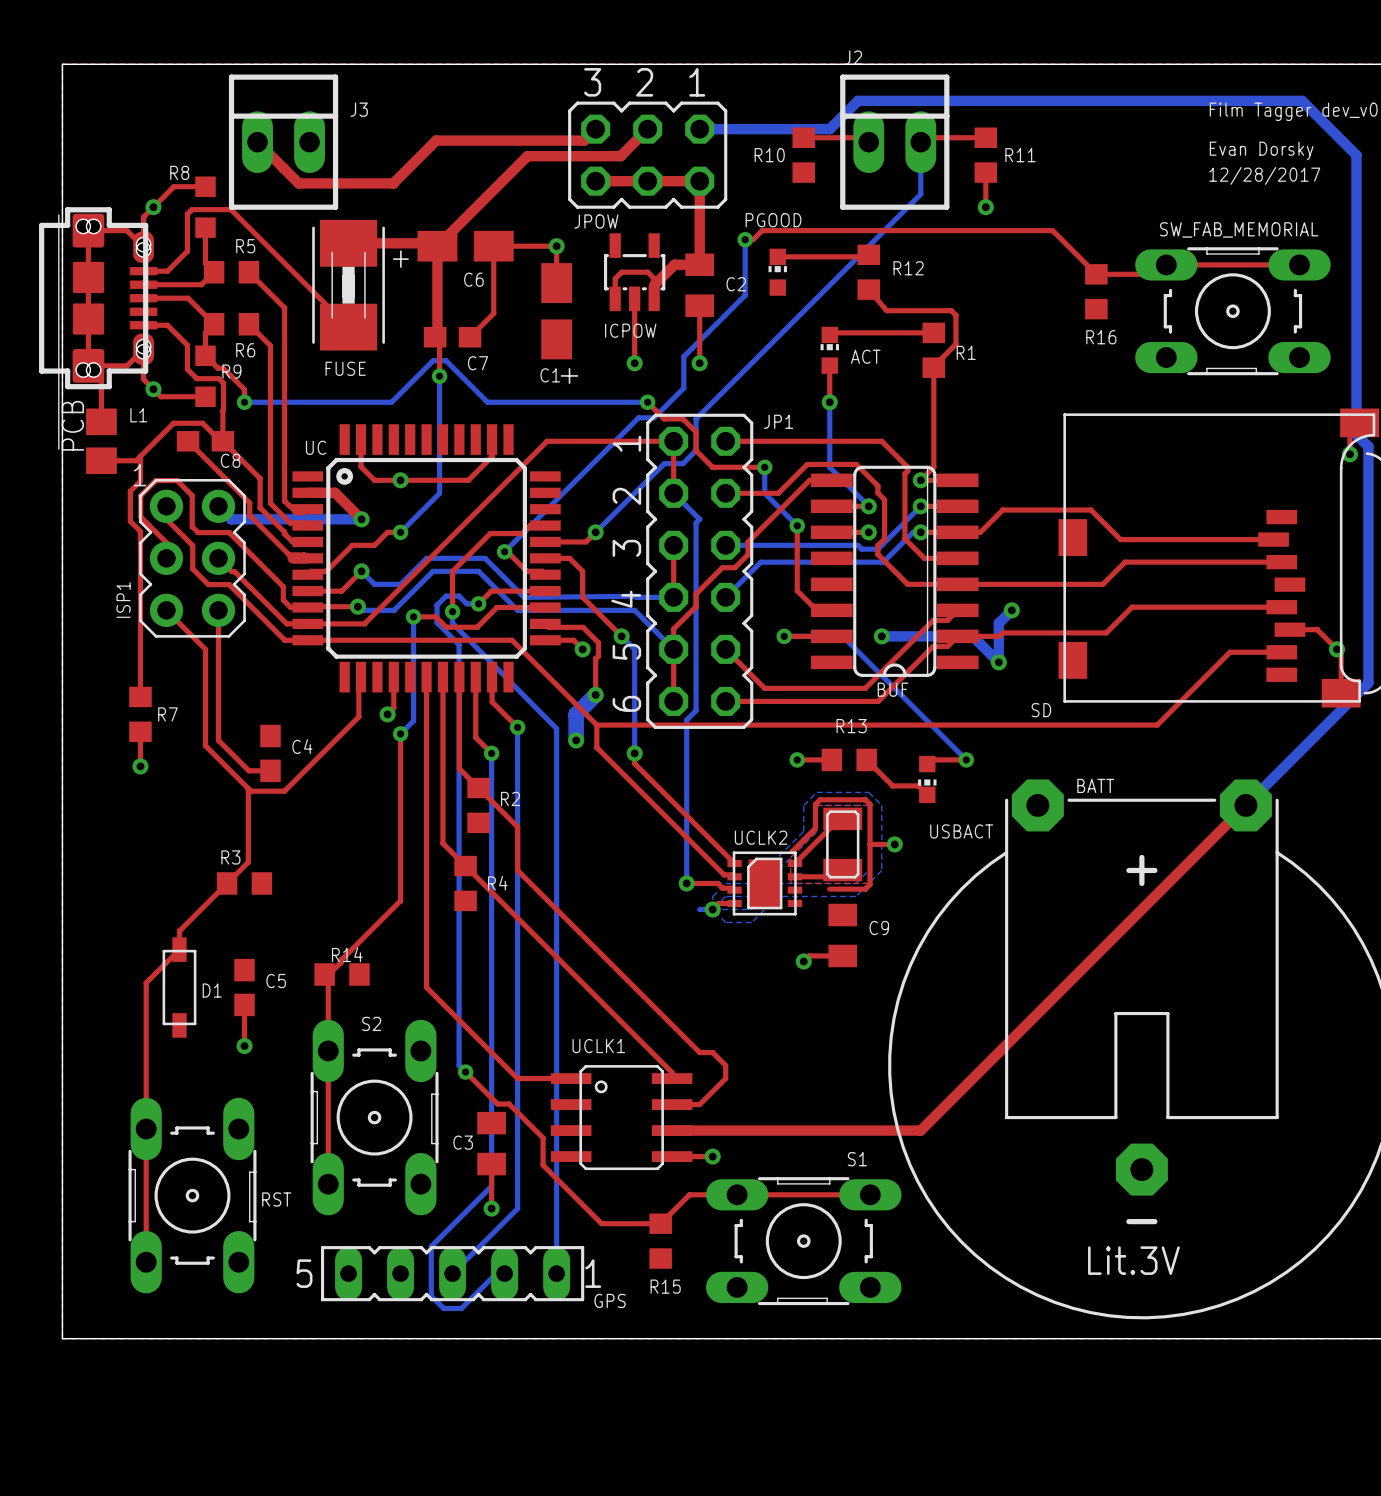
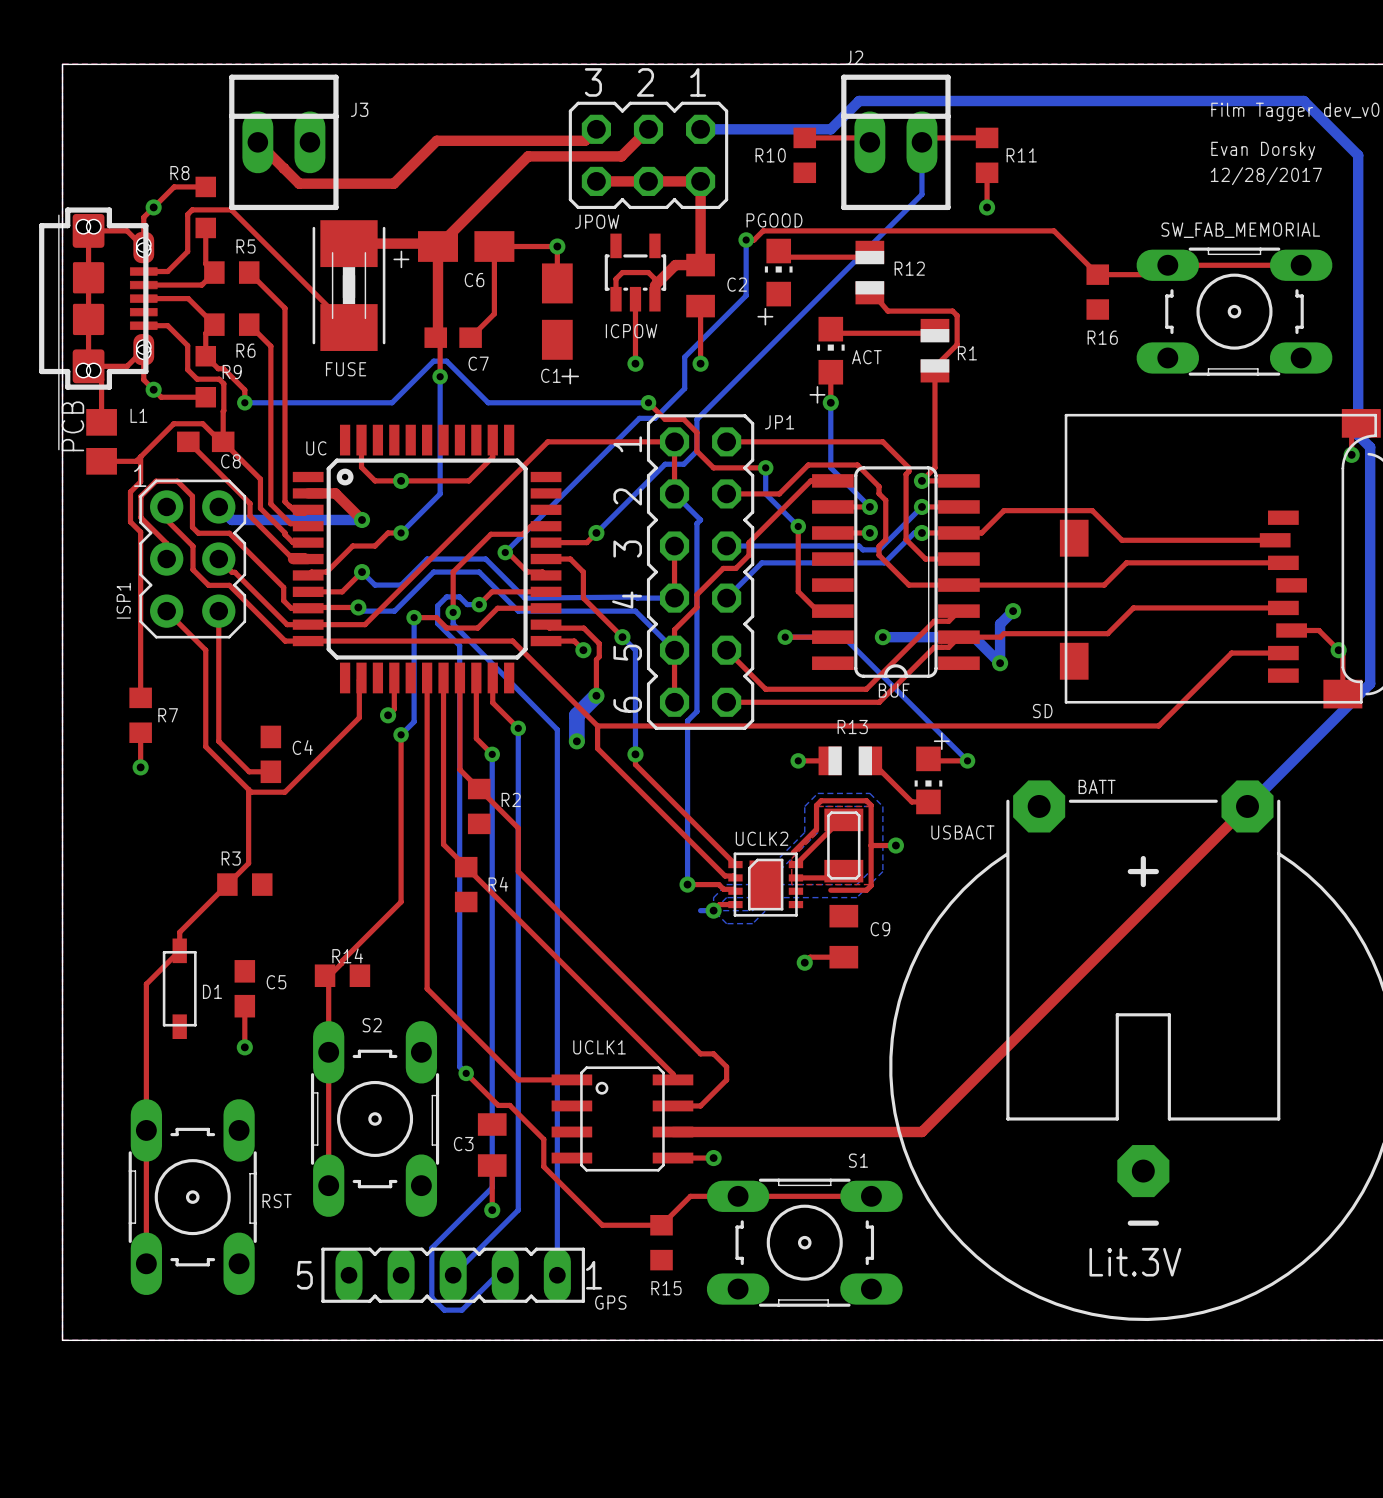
R12 footprint: [857, 244, 881, 300] -> [855, 240, 885, 305]
PGOOD footprint: [768, 248, 787, 296] -> [764, 238, 793, 307]
R1 footprint: [922, 322, 946, 378] -> [920, 318, 950, 383]
ACT footprint: [820, 326, 839, 374] -> [816, 316, 845, 385]
R13 footprint: [821, 748, 877, 772] -> [818, 746, 883, 776]
USBACT footprint: [918, 755, 937, 803] -> [914, 746, 943, 815]
top track: (866, 759) (892, 785) (918, 785) (927, 794) -> none
top track: none -> (870, 760) (911, 801) (928, 801)

